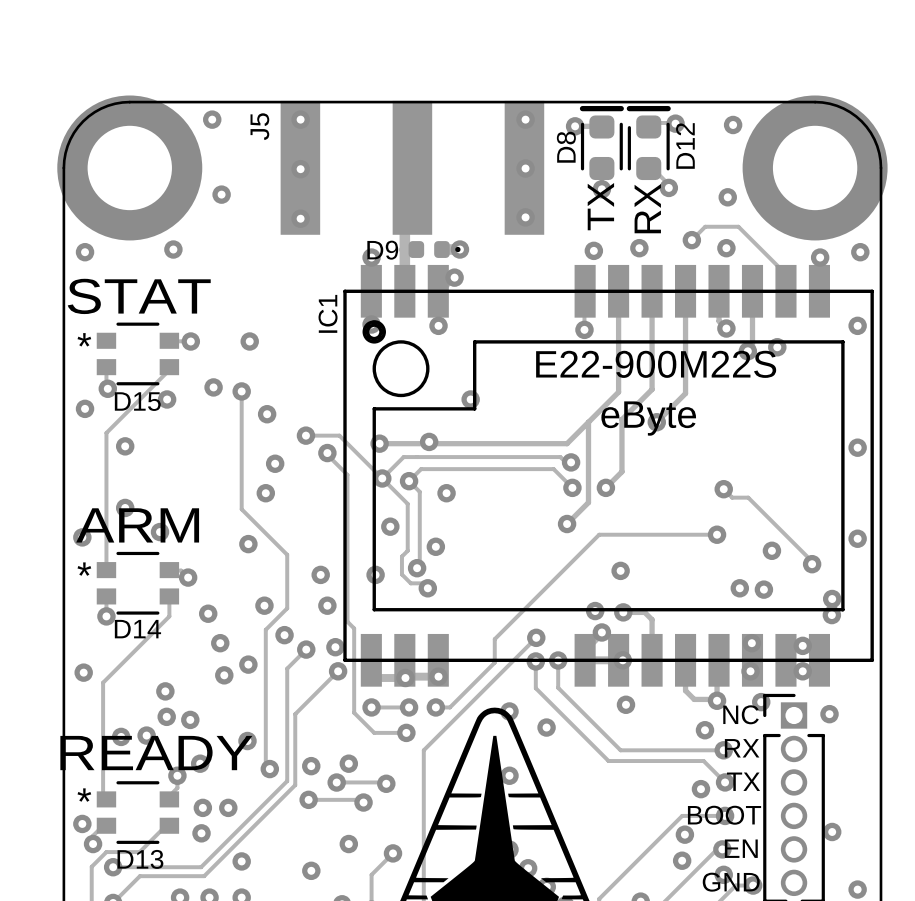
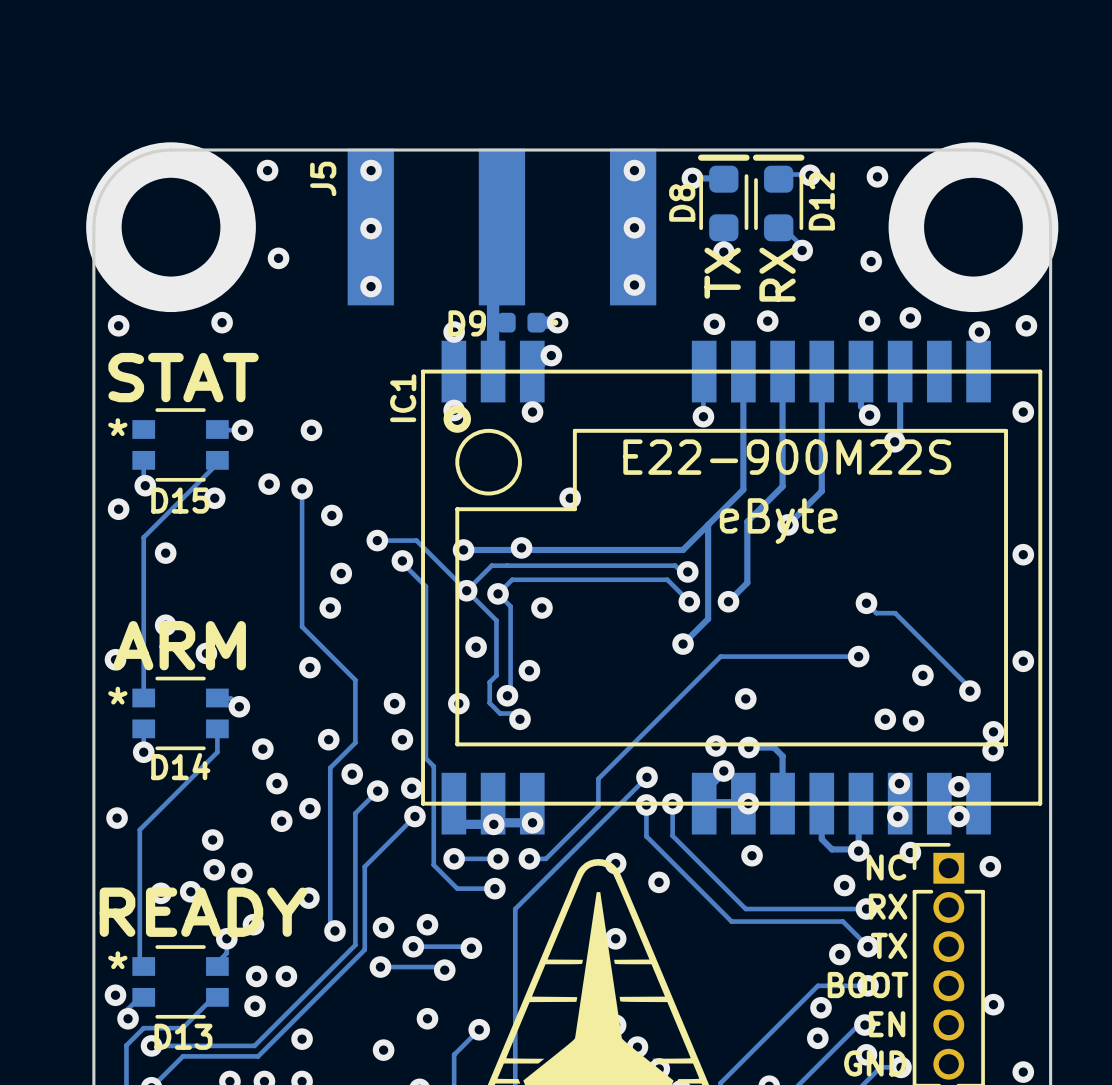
track: (691, 240) (705, 226) (738, 226) (785, 274) (785, 291) -> none
via: (691, 240) -> none
via: none -> (910, 317)
via: (777, 347) -> none

